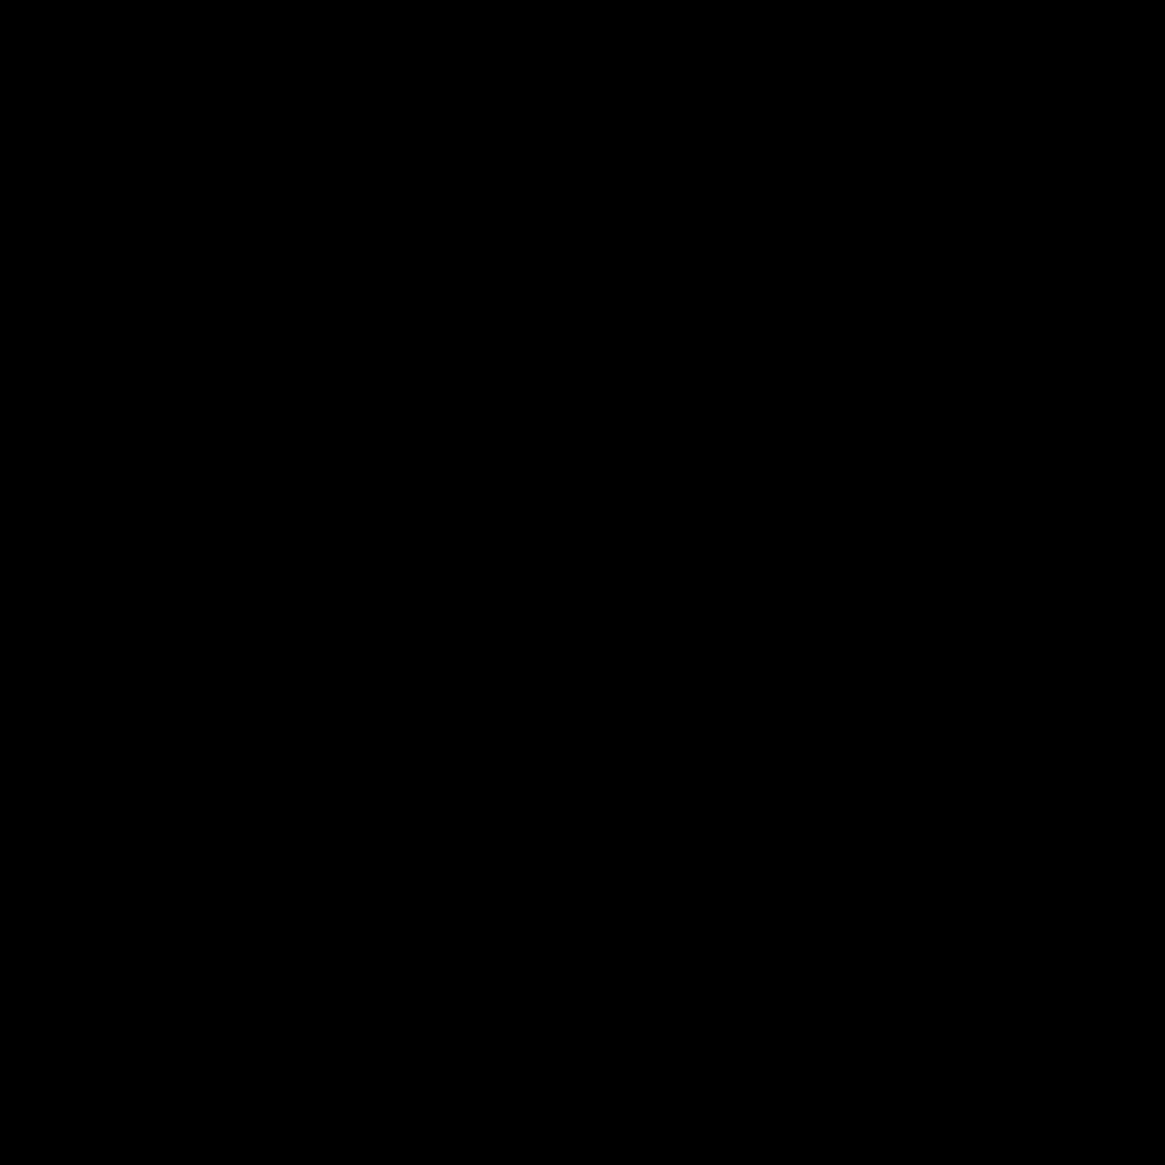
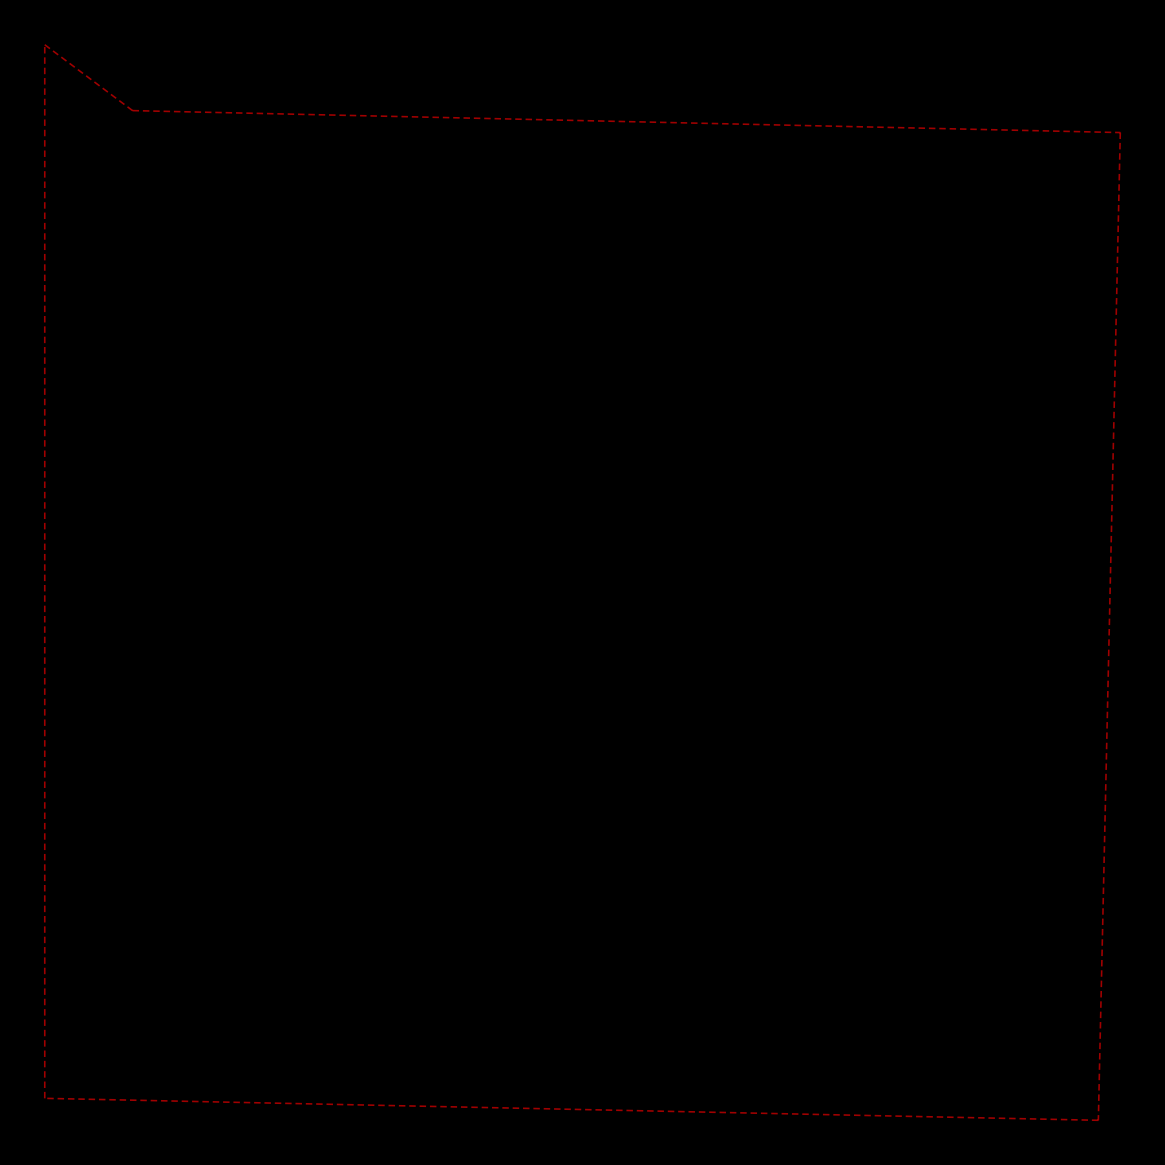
zone outline: none -> (44, 44) (44, 1098) (1098, 1120) (1120, 132) (132, 110) (44, 44)

